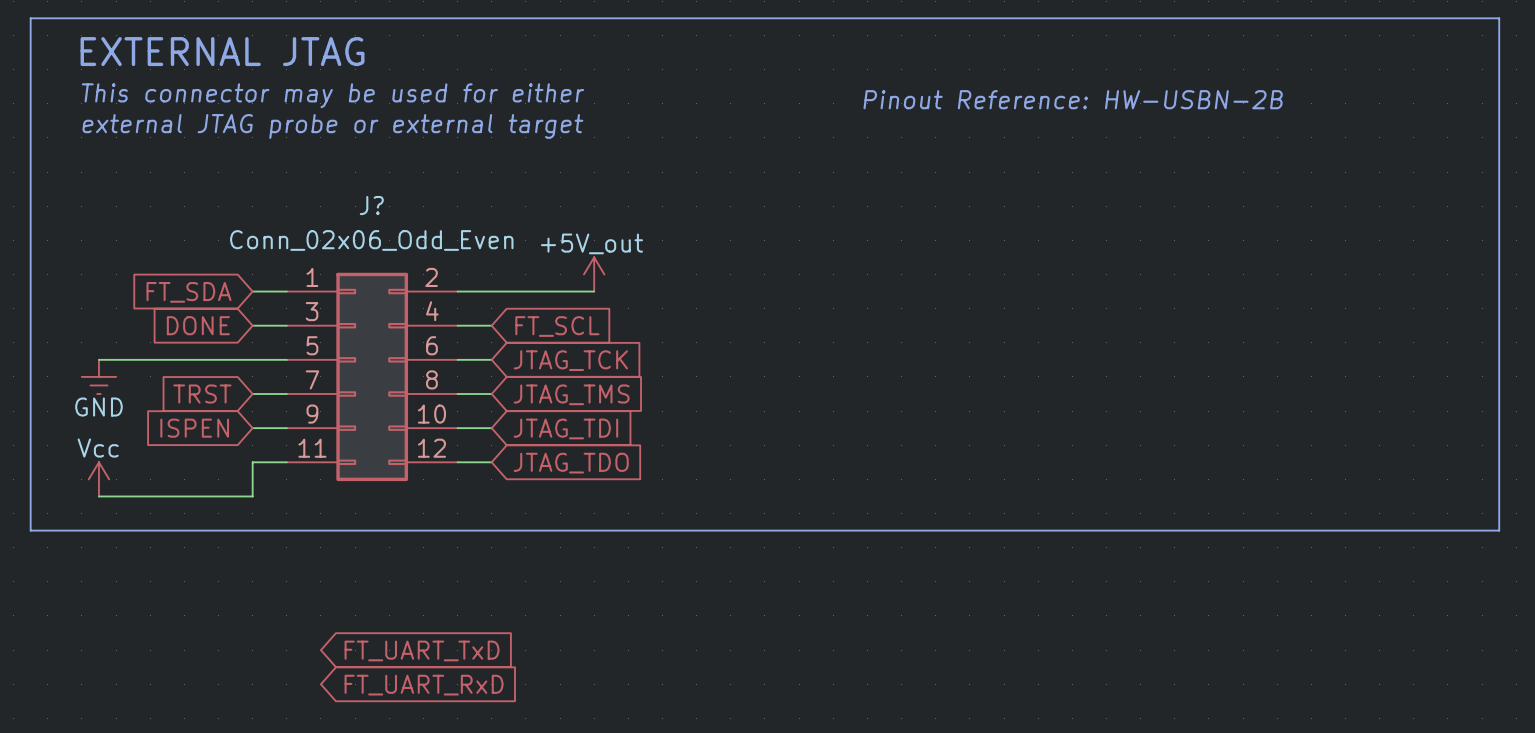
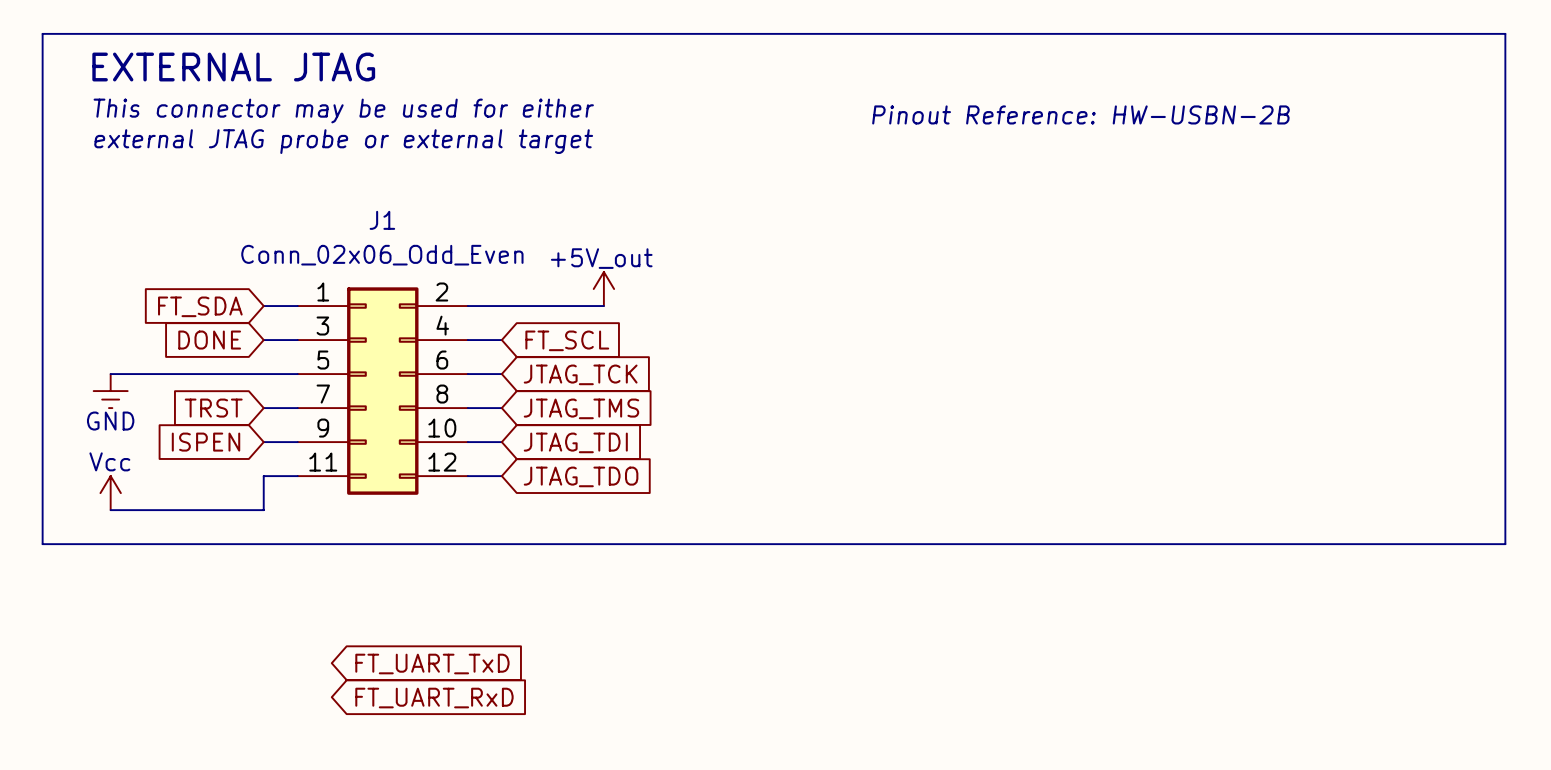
J? name: J? (371, 205) -> J1 (382, 220)

